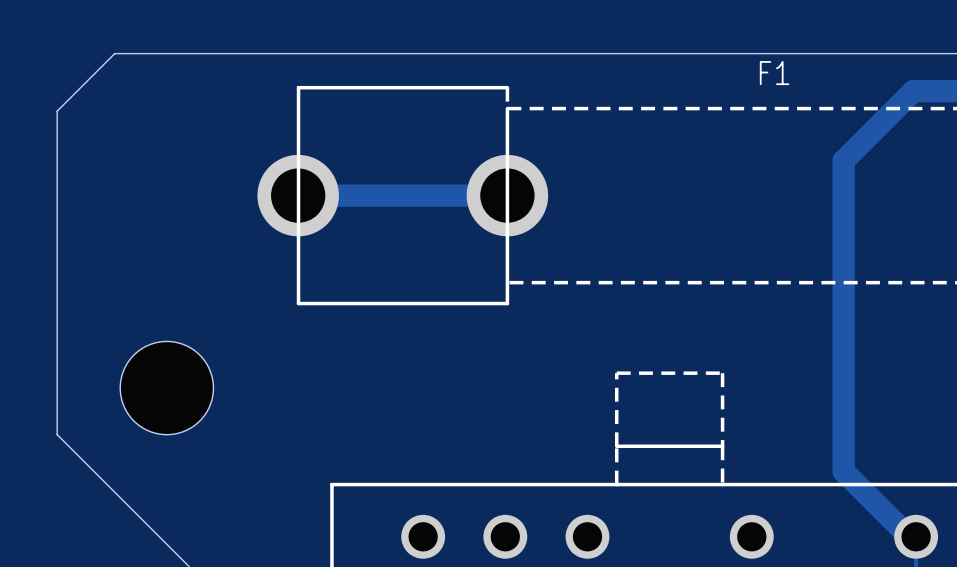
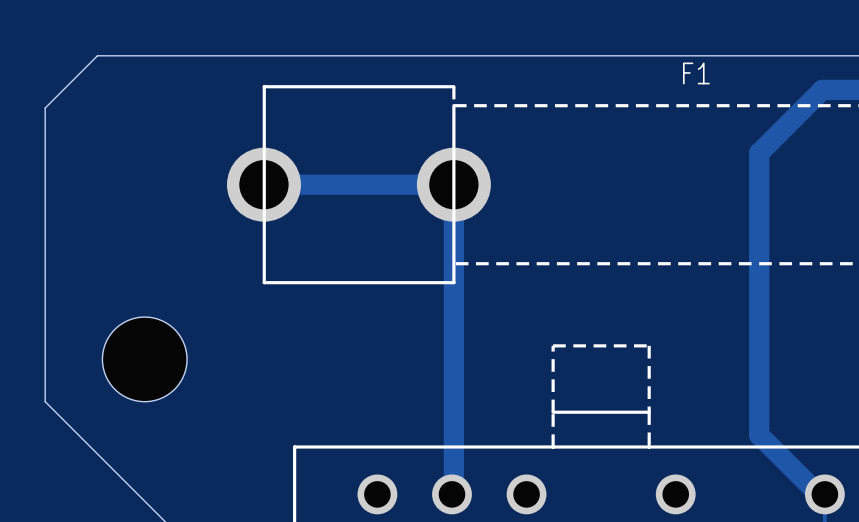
track: none -> (453, 184) (453, 492) (451, 494)

